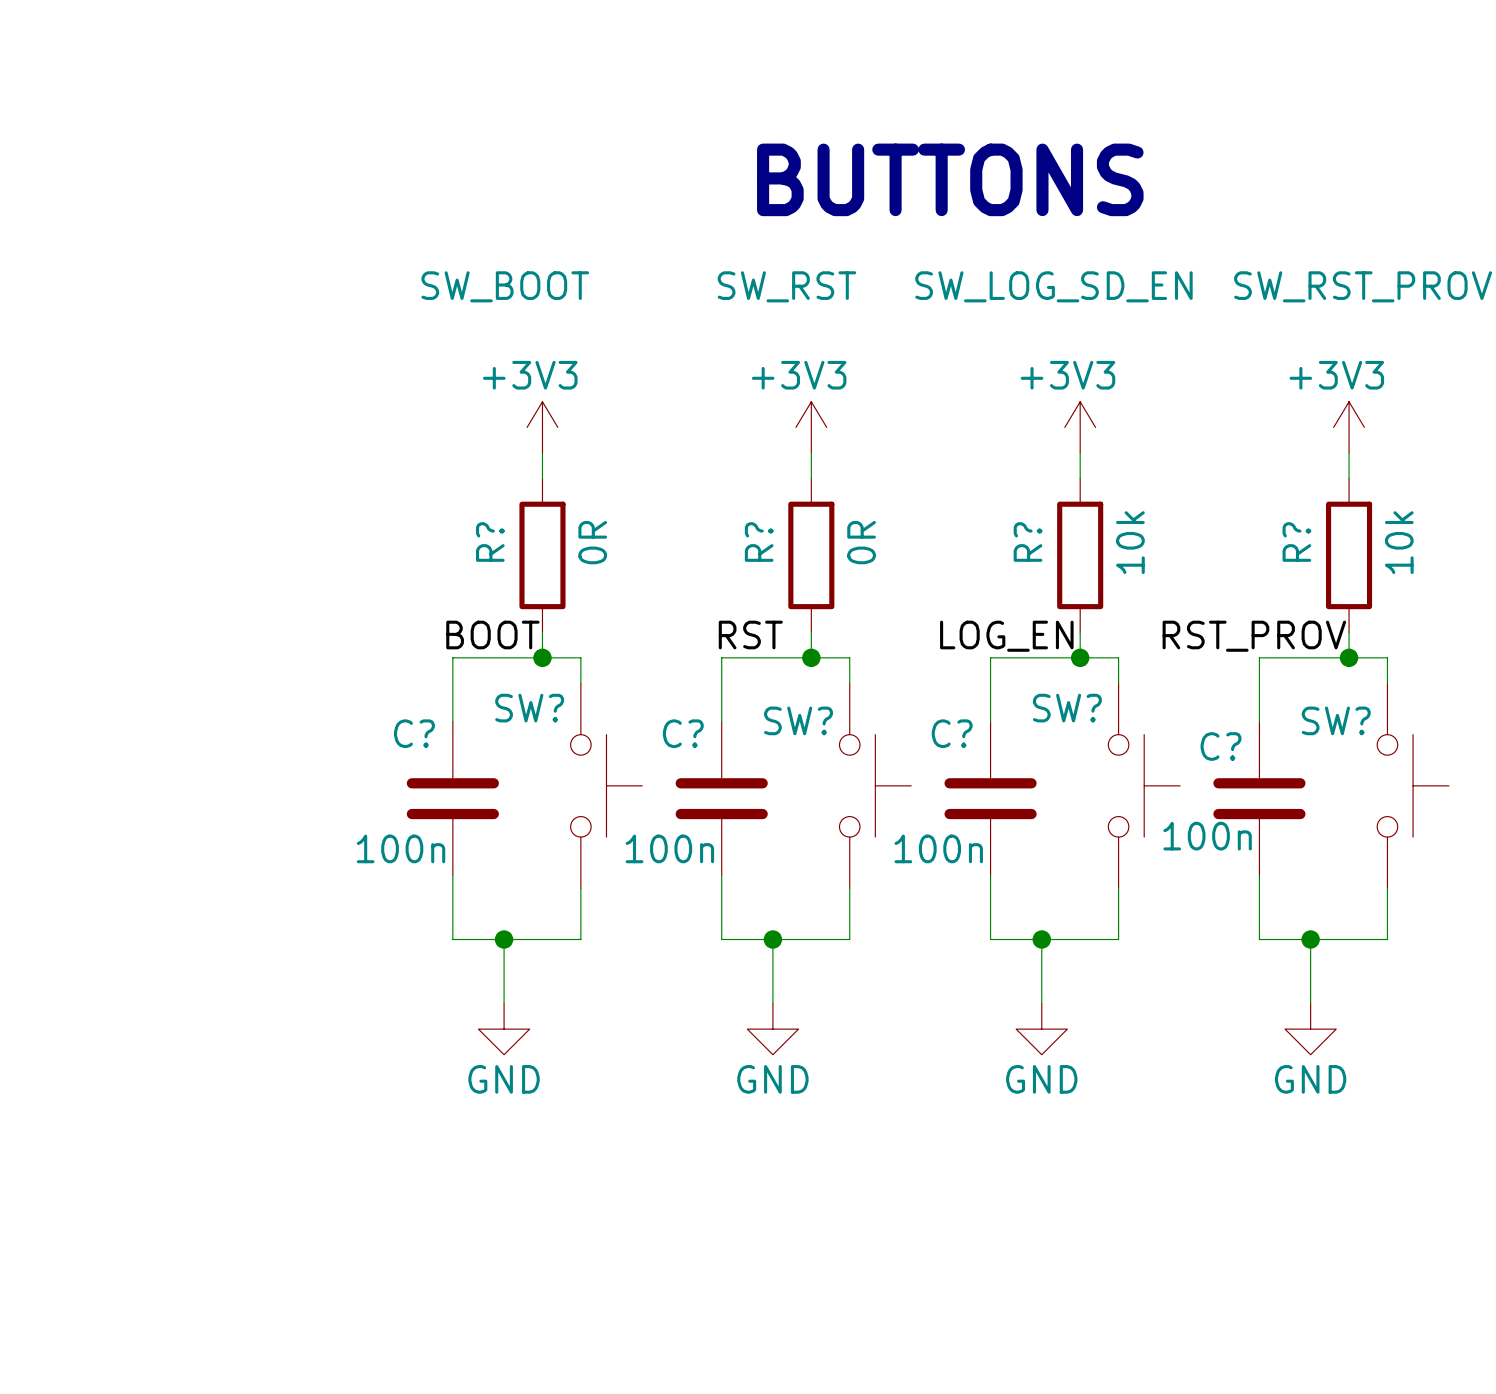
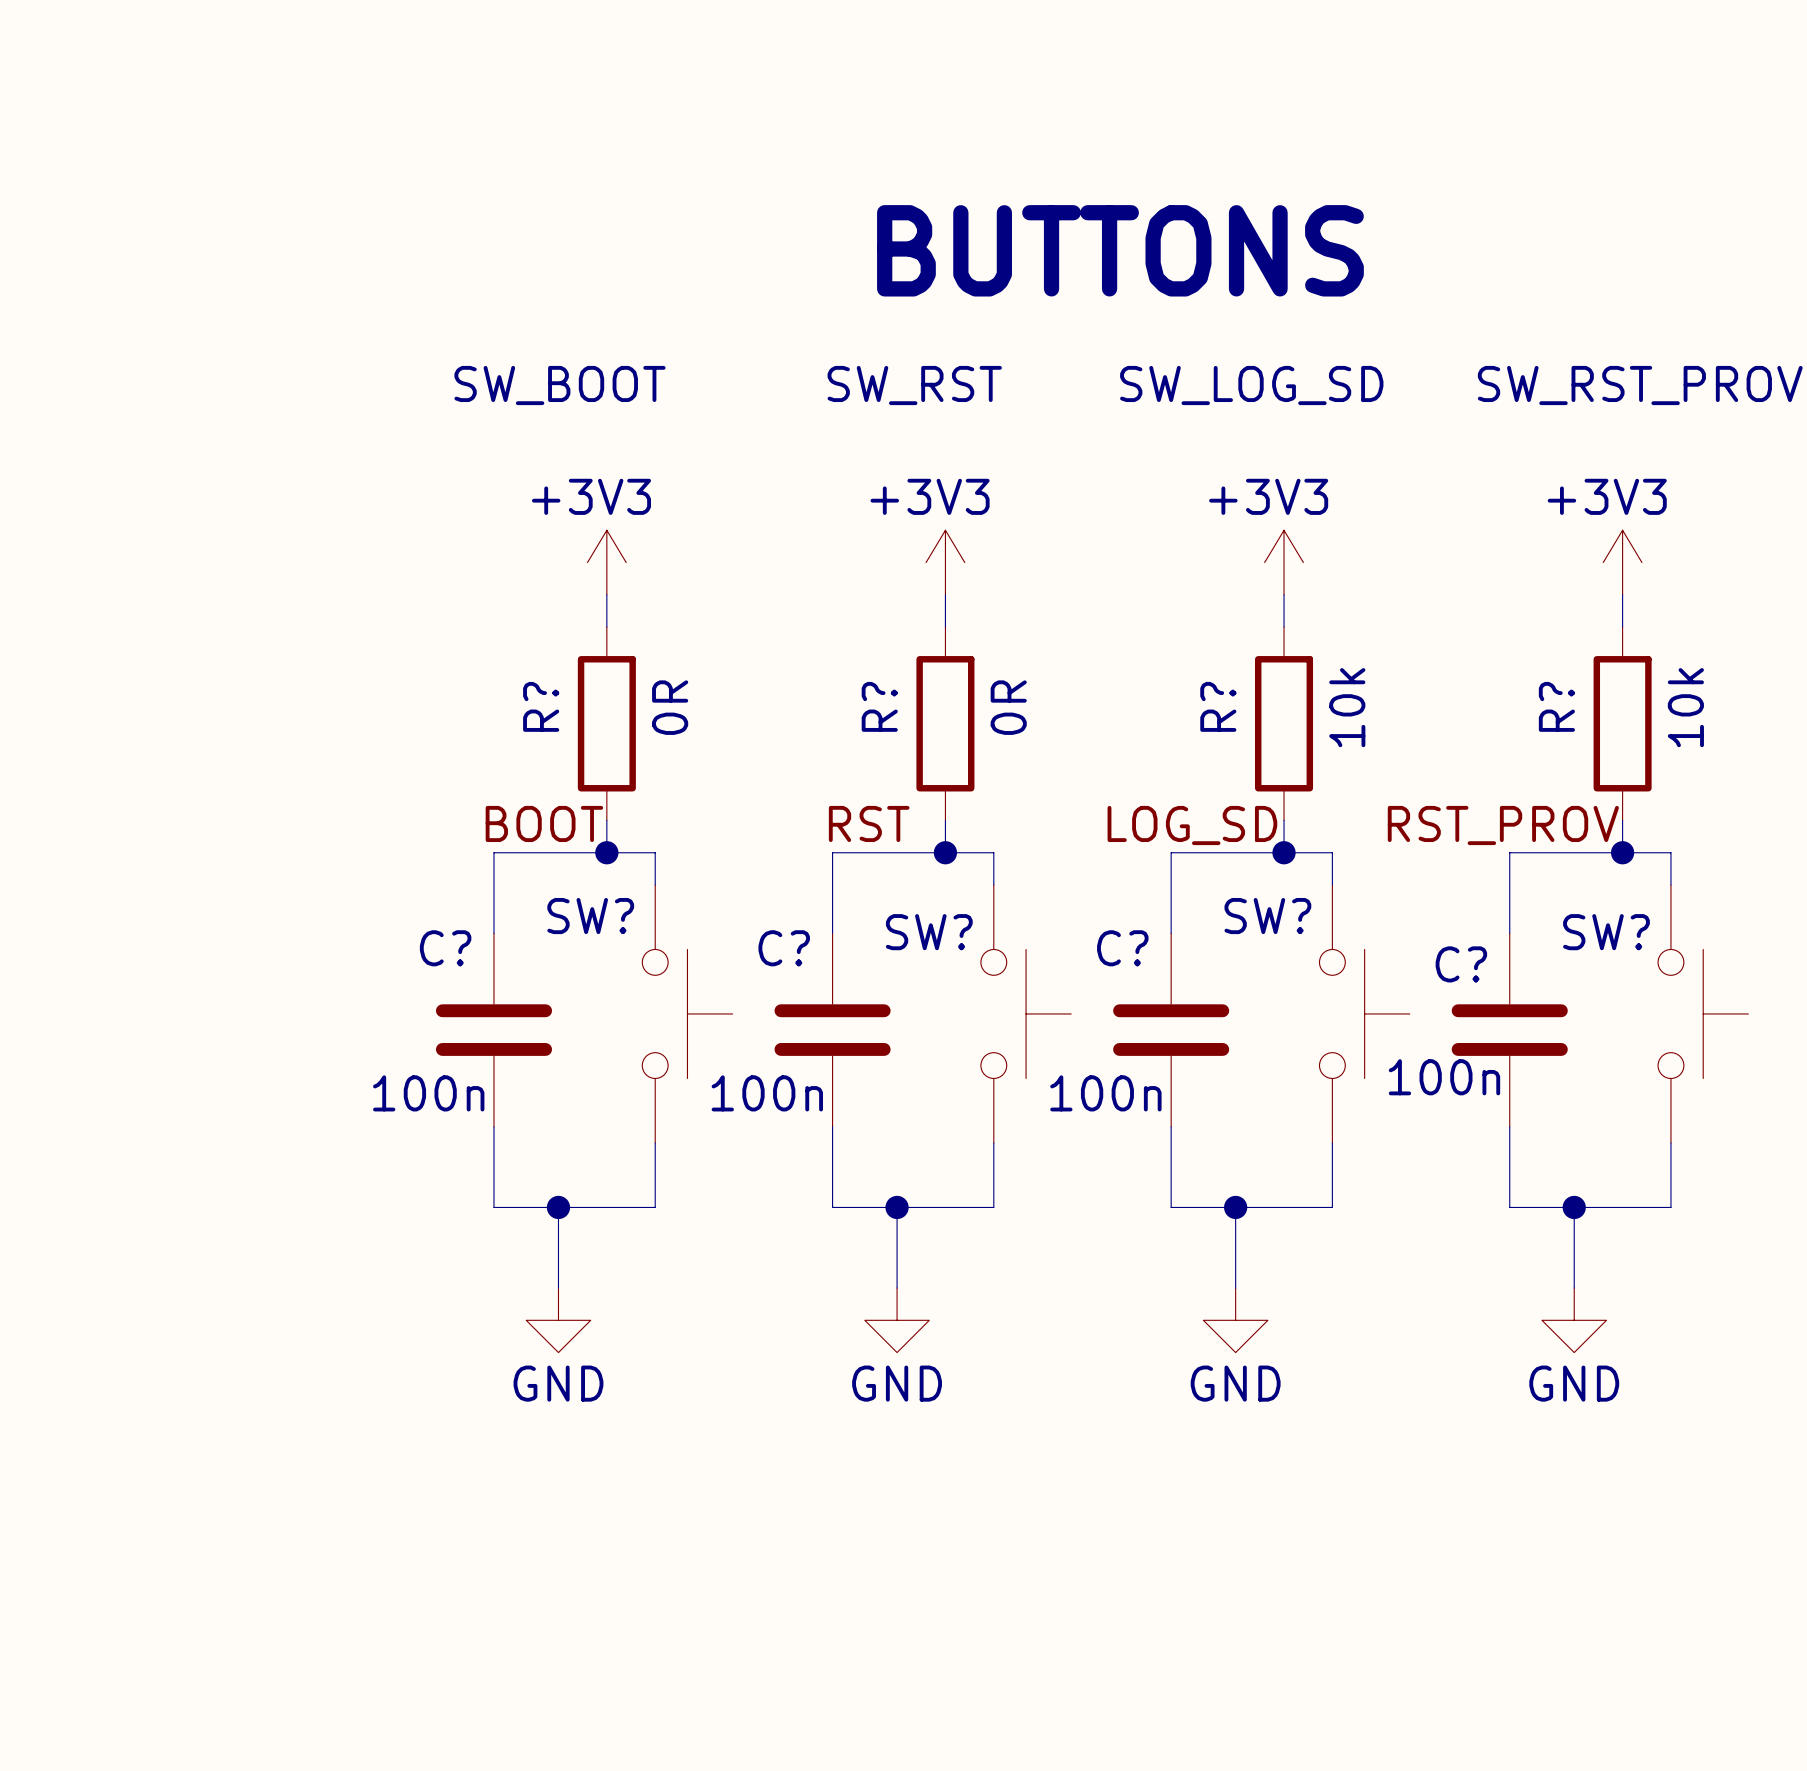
SW? value: SW_LOG_SD_EN (1053, 286) -> SW_LOG_SD (1251, 385)
label: LOG_EN (1006, 636) -> LOG_SD (1192, 825)

